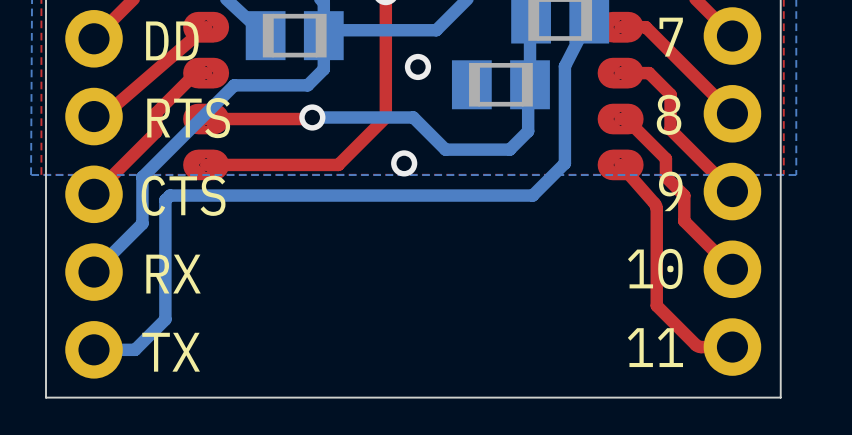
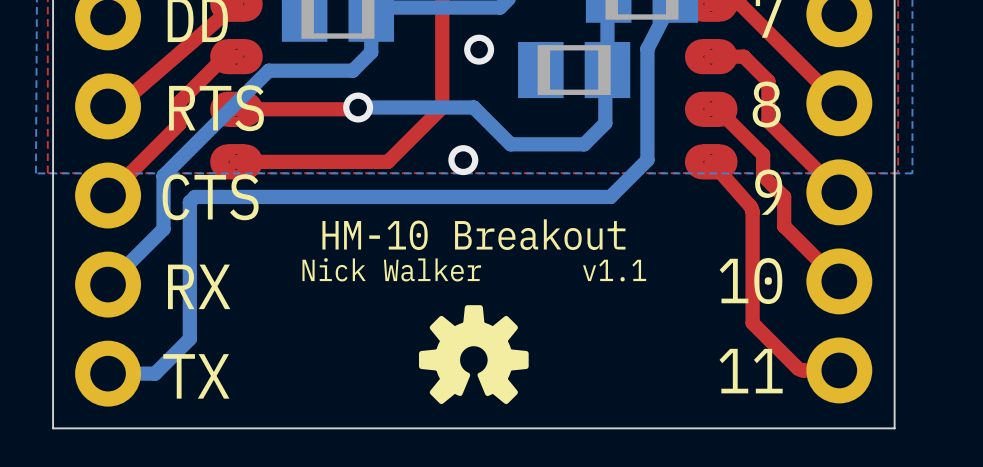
text: none -> HM-10 Breakout (473, 234)
text: none -> Nick Walker (391, 269)
text: none -> v1.1 (614, 270)
drawing: none -> [419, 305, 529, 405]

